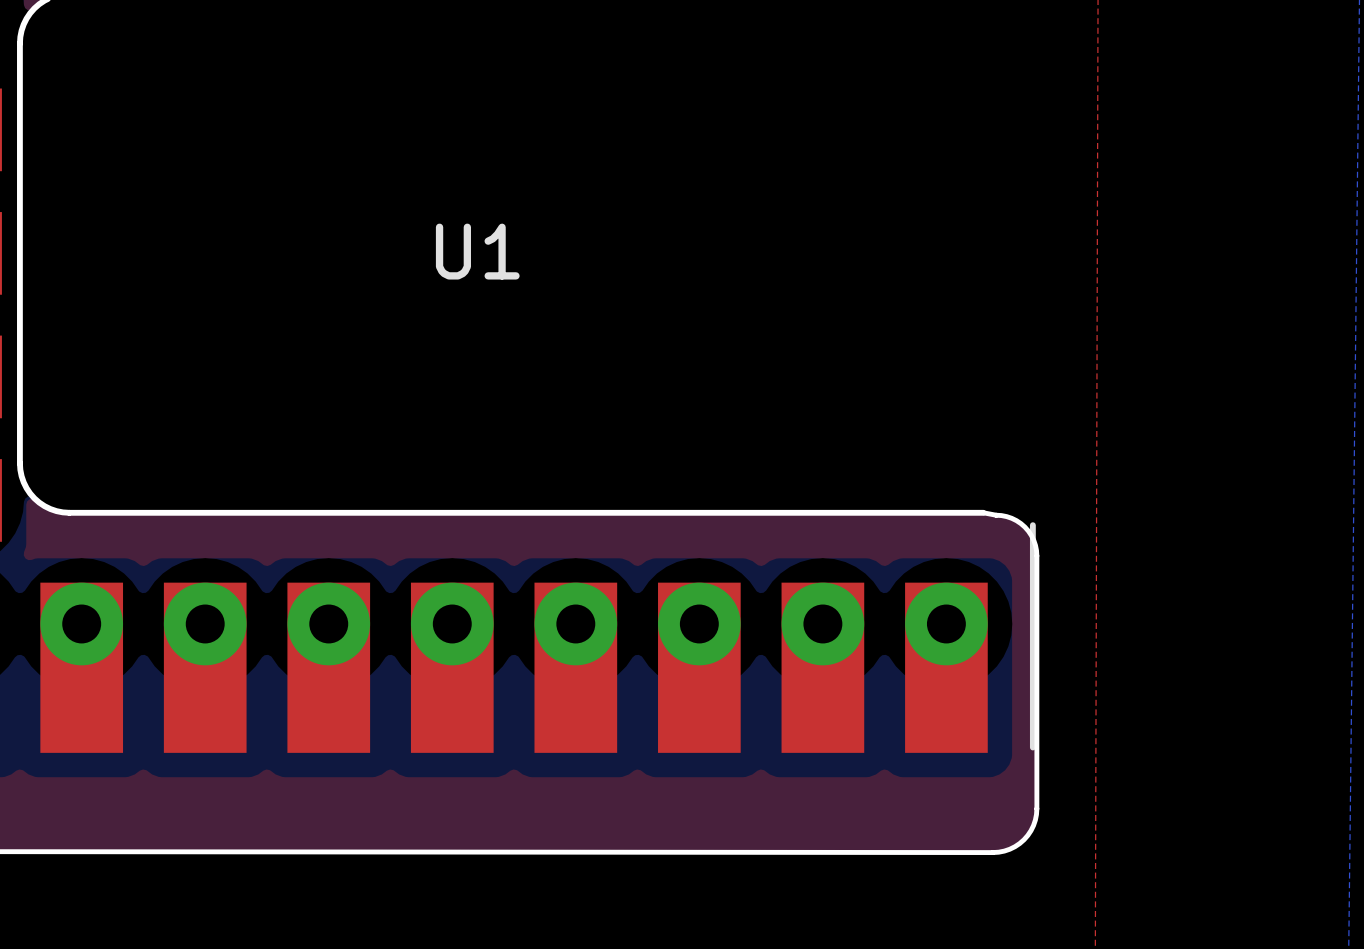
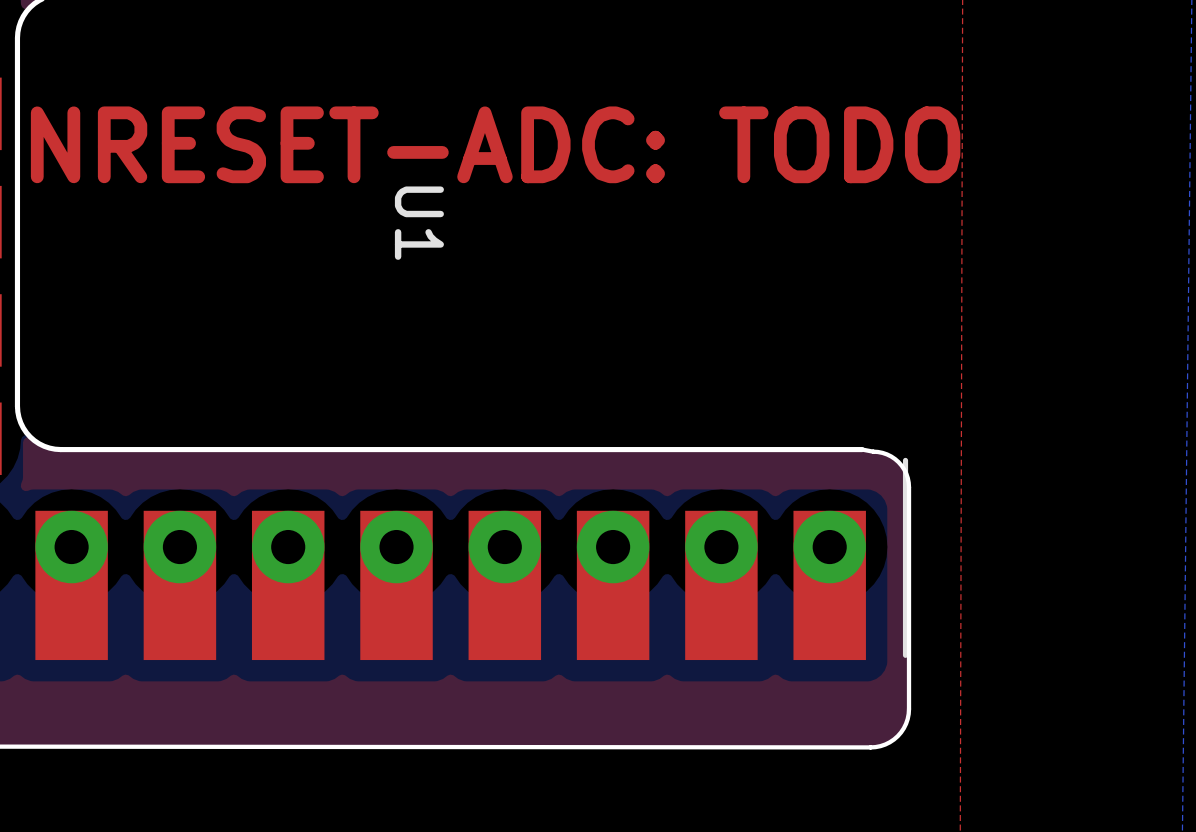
text: none -> NRESET-ADC: TODO (495, 144)
U1 name rotation: 0° (477, 251) -> 90° clockwise (419, 223)

